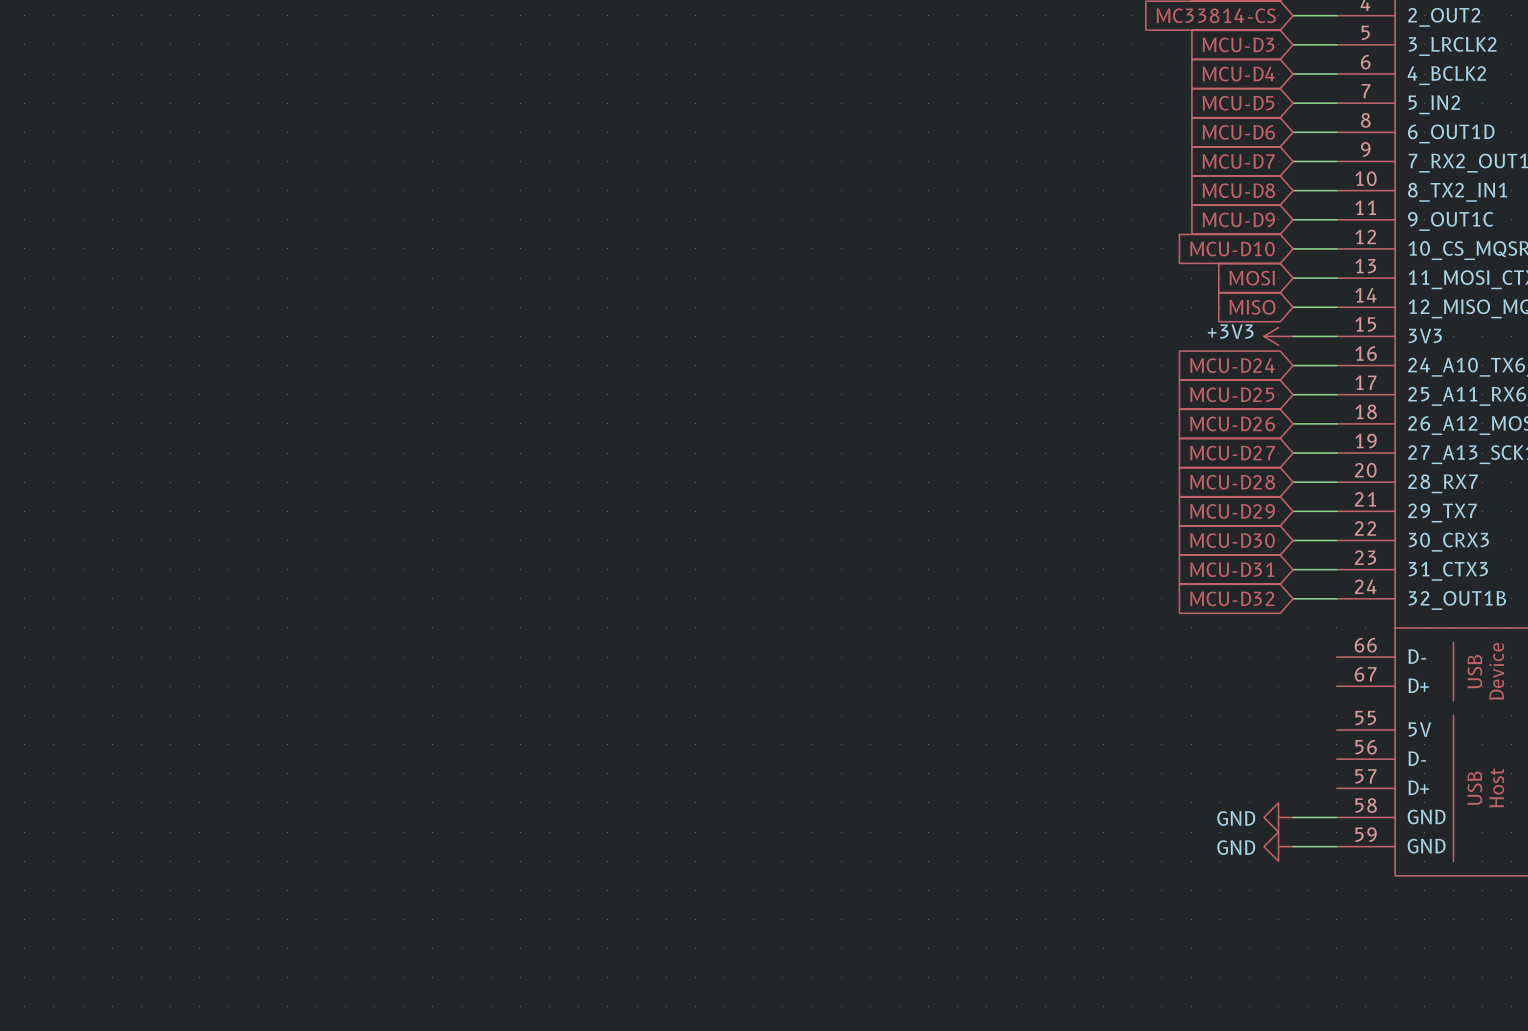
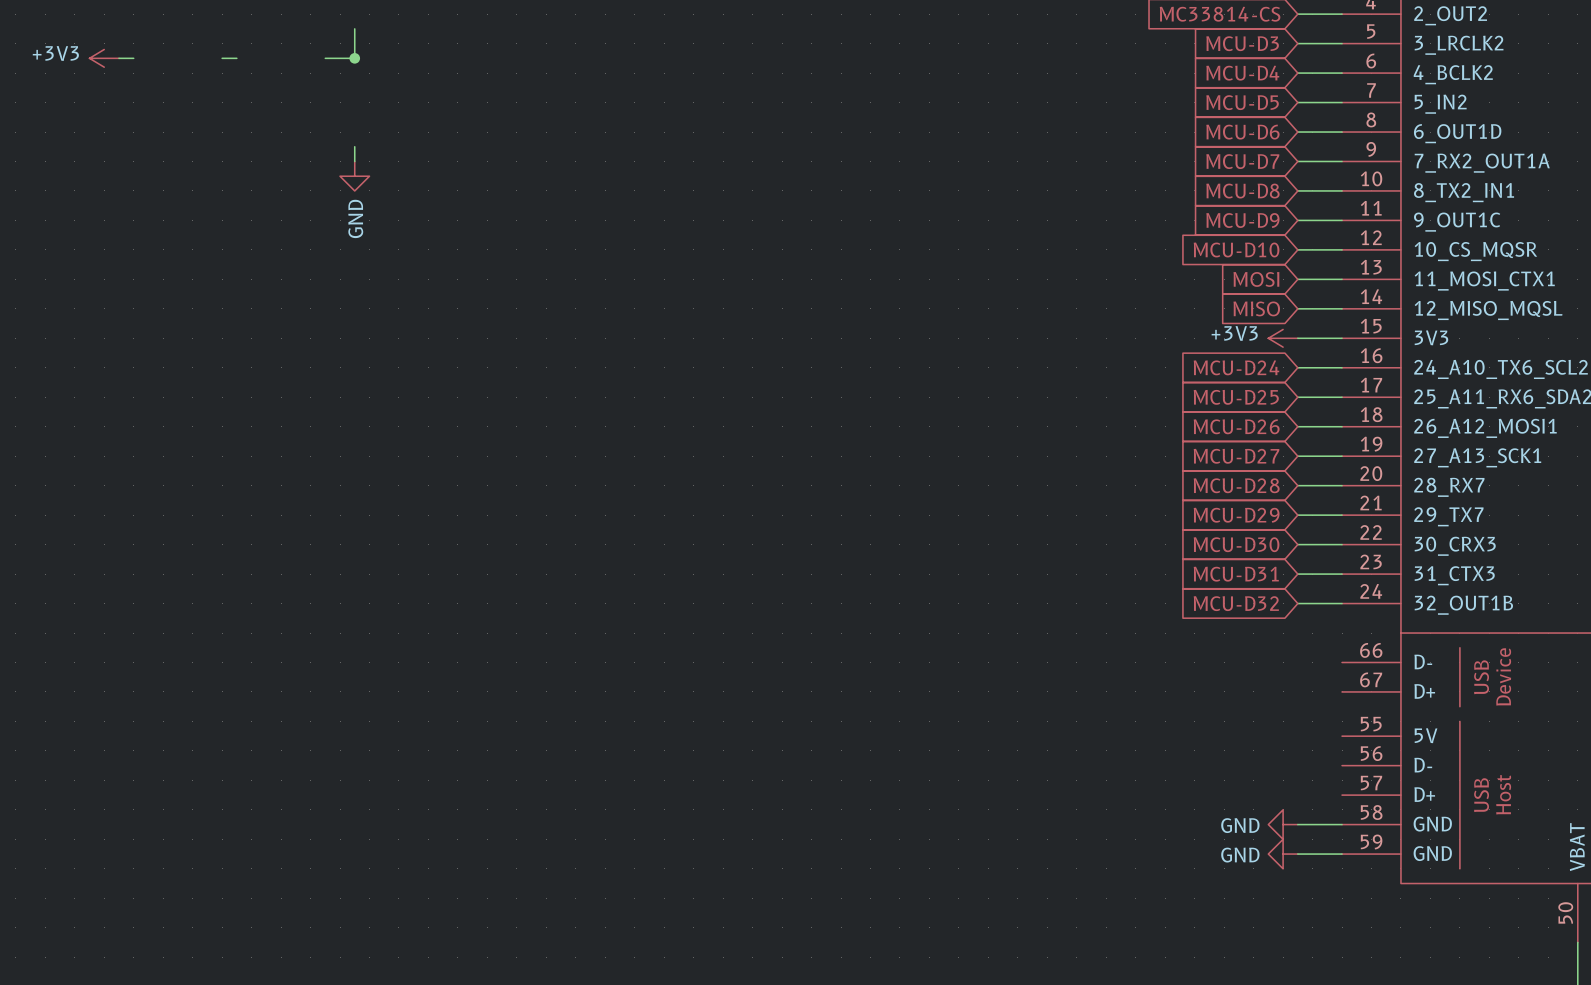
wire: none -> (354, 28) (354, 58) (325, 58)
power symbol: none -> +3V3 (104, 58)
wire: none -> (118, 58) (133, 58)
wire: none -> (222, 58) (236, 58)
junction: none -> (354, 58)
wire: none -> (354, 146) (354, 161)
power symbol: none -> GND (354, 176)

